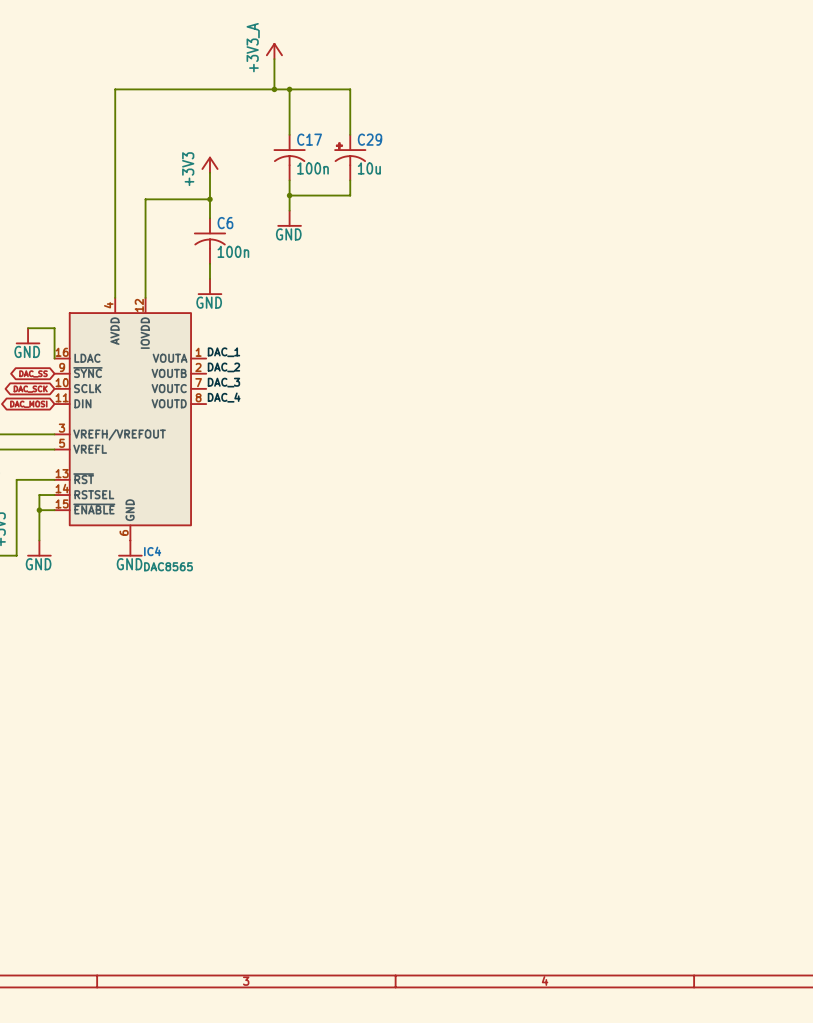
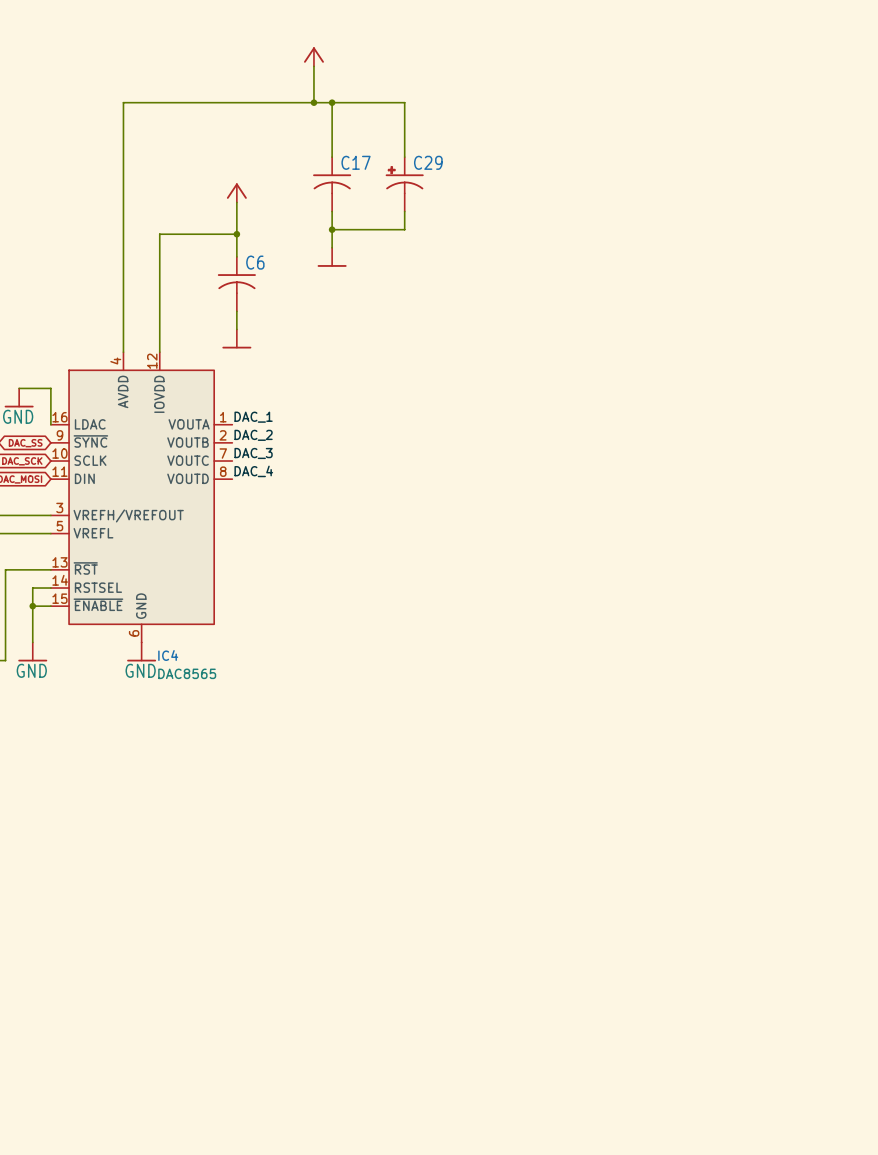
power symbol text: +3V3_A (253, 47) -> none
C17 value: 100n (313, 168) -> none
C29 value: 10u (369, 168) -> none
power symbol text: +3V3 (188, 169) -> none
power symbol text: GND (288, 234) -> none
C6 value: 100n (233, 251) -> none
power symbol text: GND (209, 302) -> none

